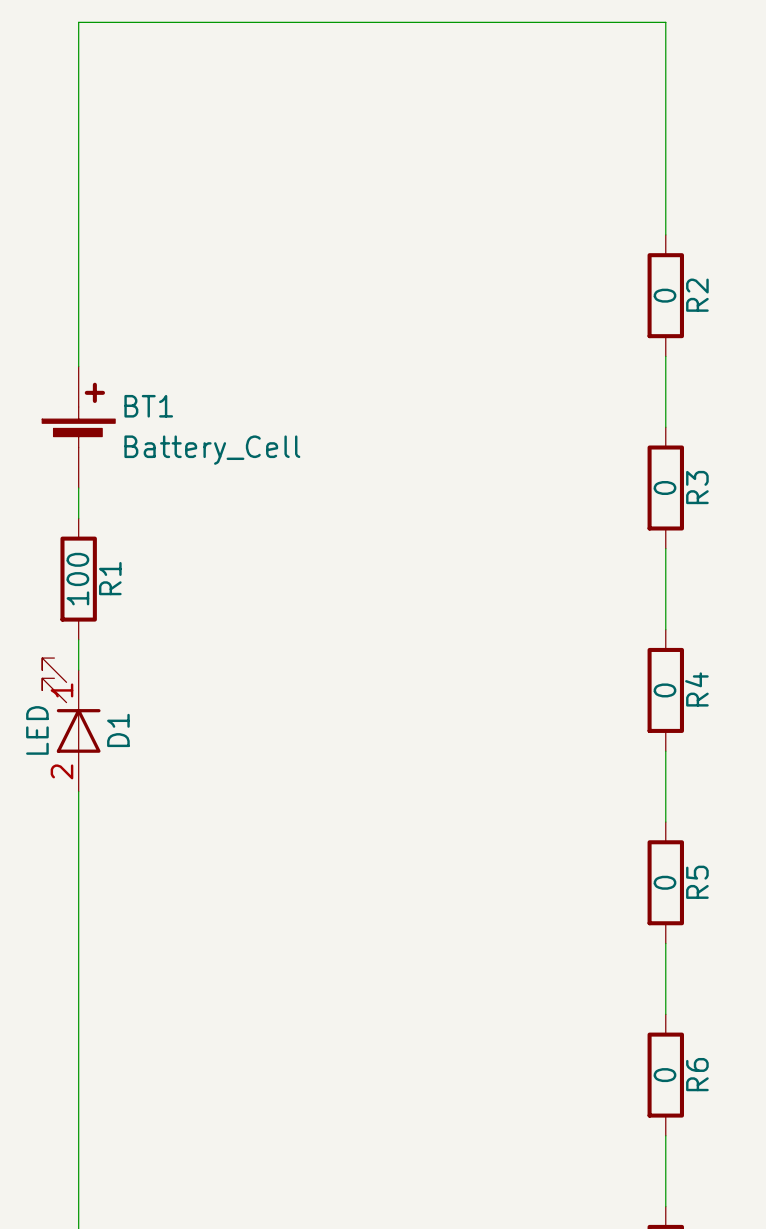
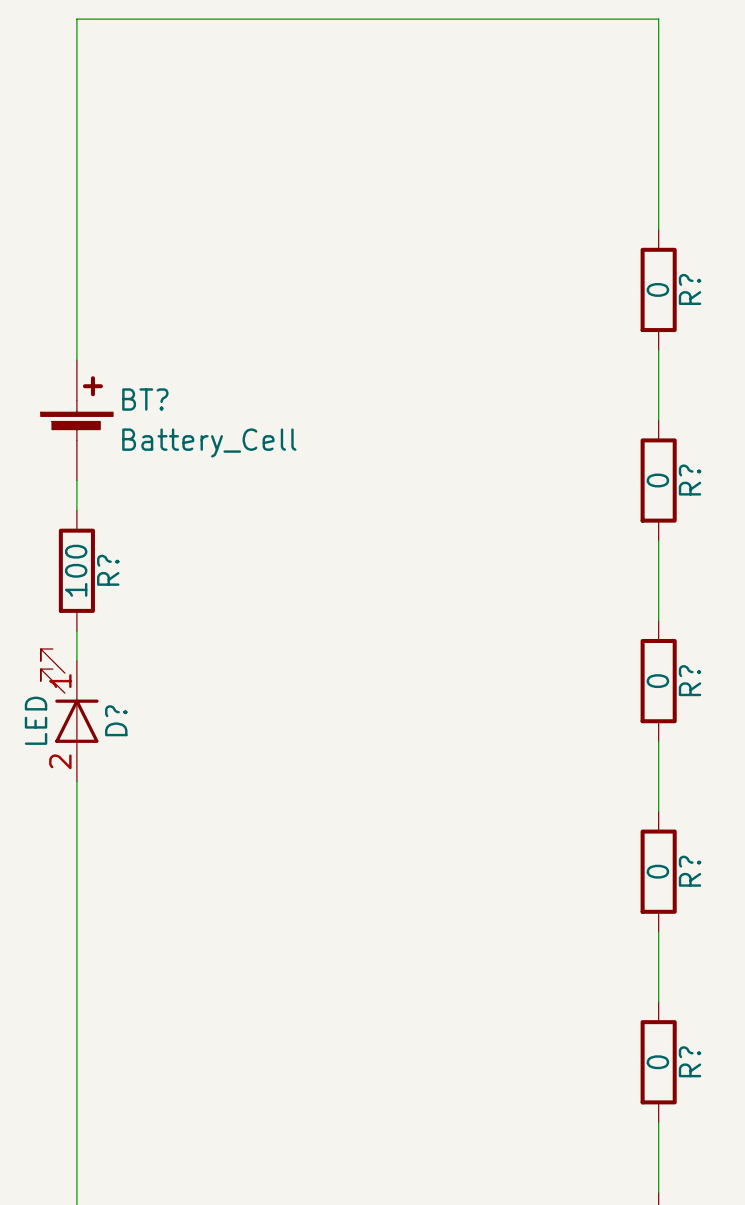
R2 name: R2 (697, 295) -> R? (690, 289)
BT1 name: BT1 (148, 406) -> BT? (145, 399)
R3 name: R3 (697, 487) -> R? (690, 480)
R1 name: R1 (110, 578) -> R? (108, 570)
R4 name: R4 (696, 689) -> R? (690, 680)
D1 name: D1 (118, 730) -> D? (116, 720)
R5 name: R5 (697, 882) -> R? (690, 871)
R6 name: R6 (697, 1074) -> R? (690, 1061)

